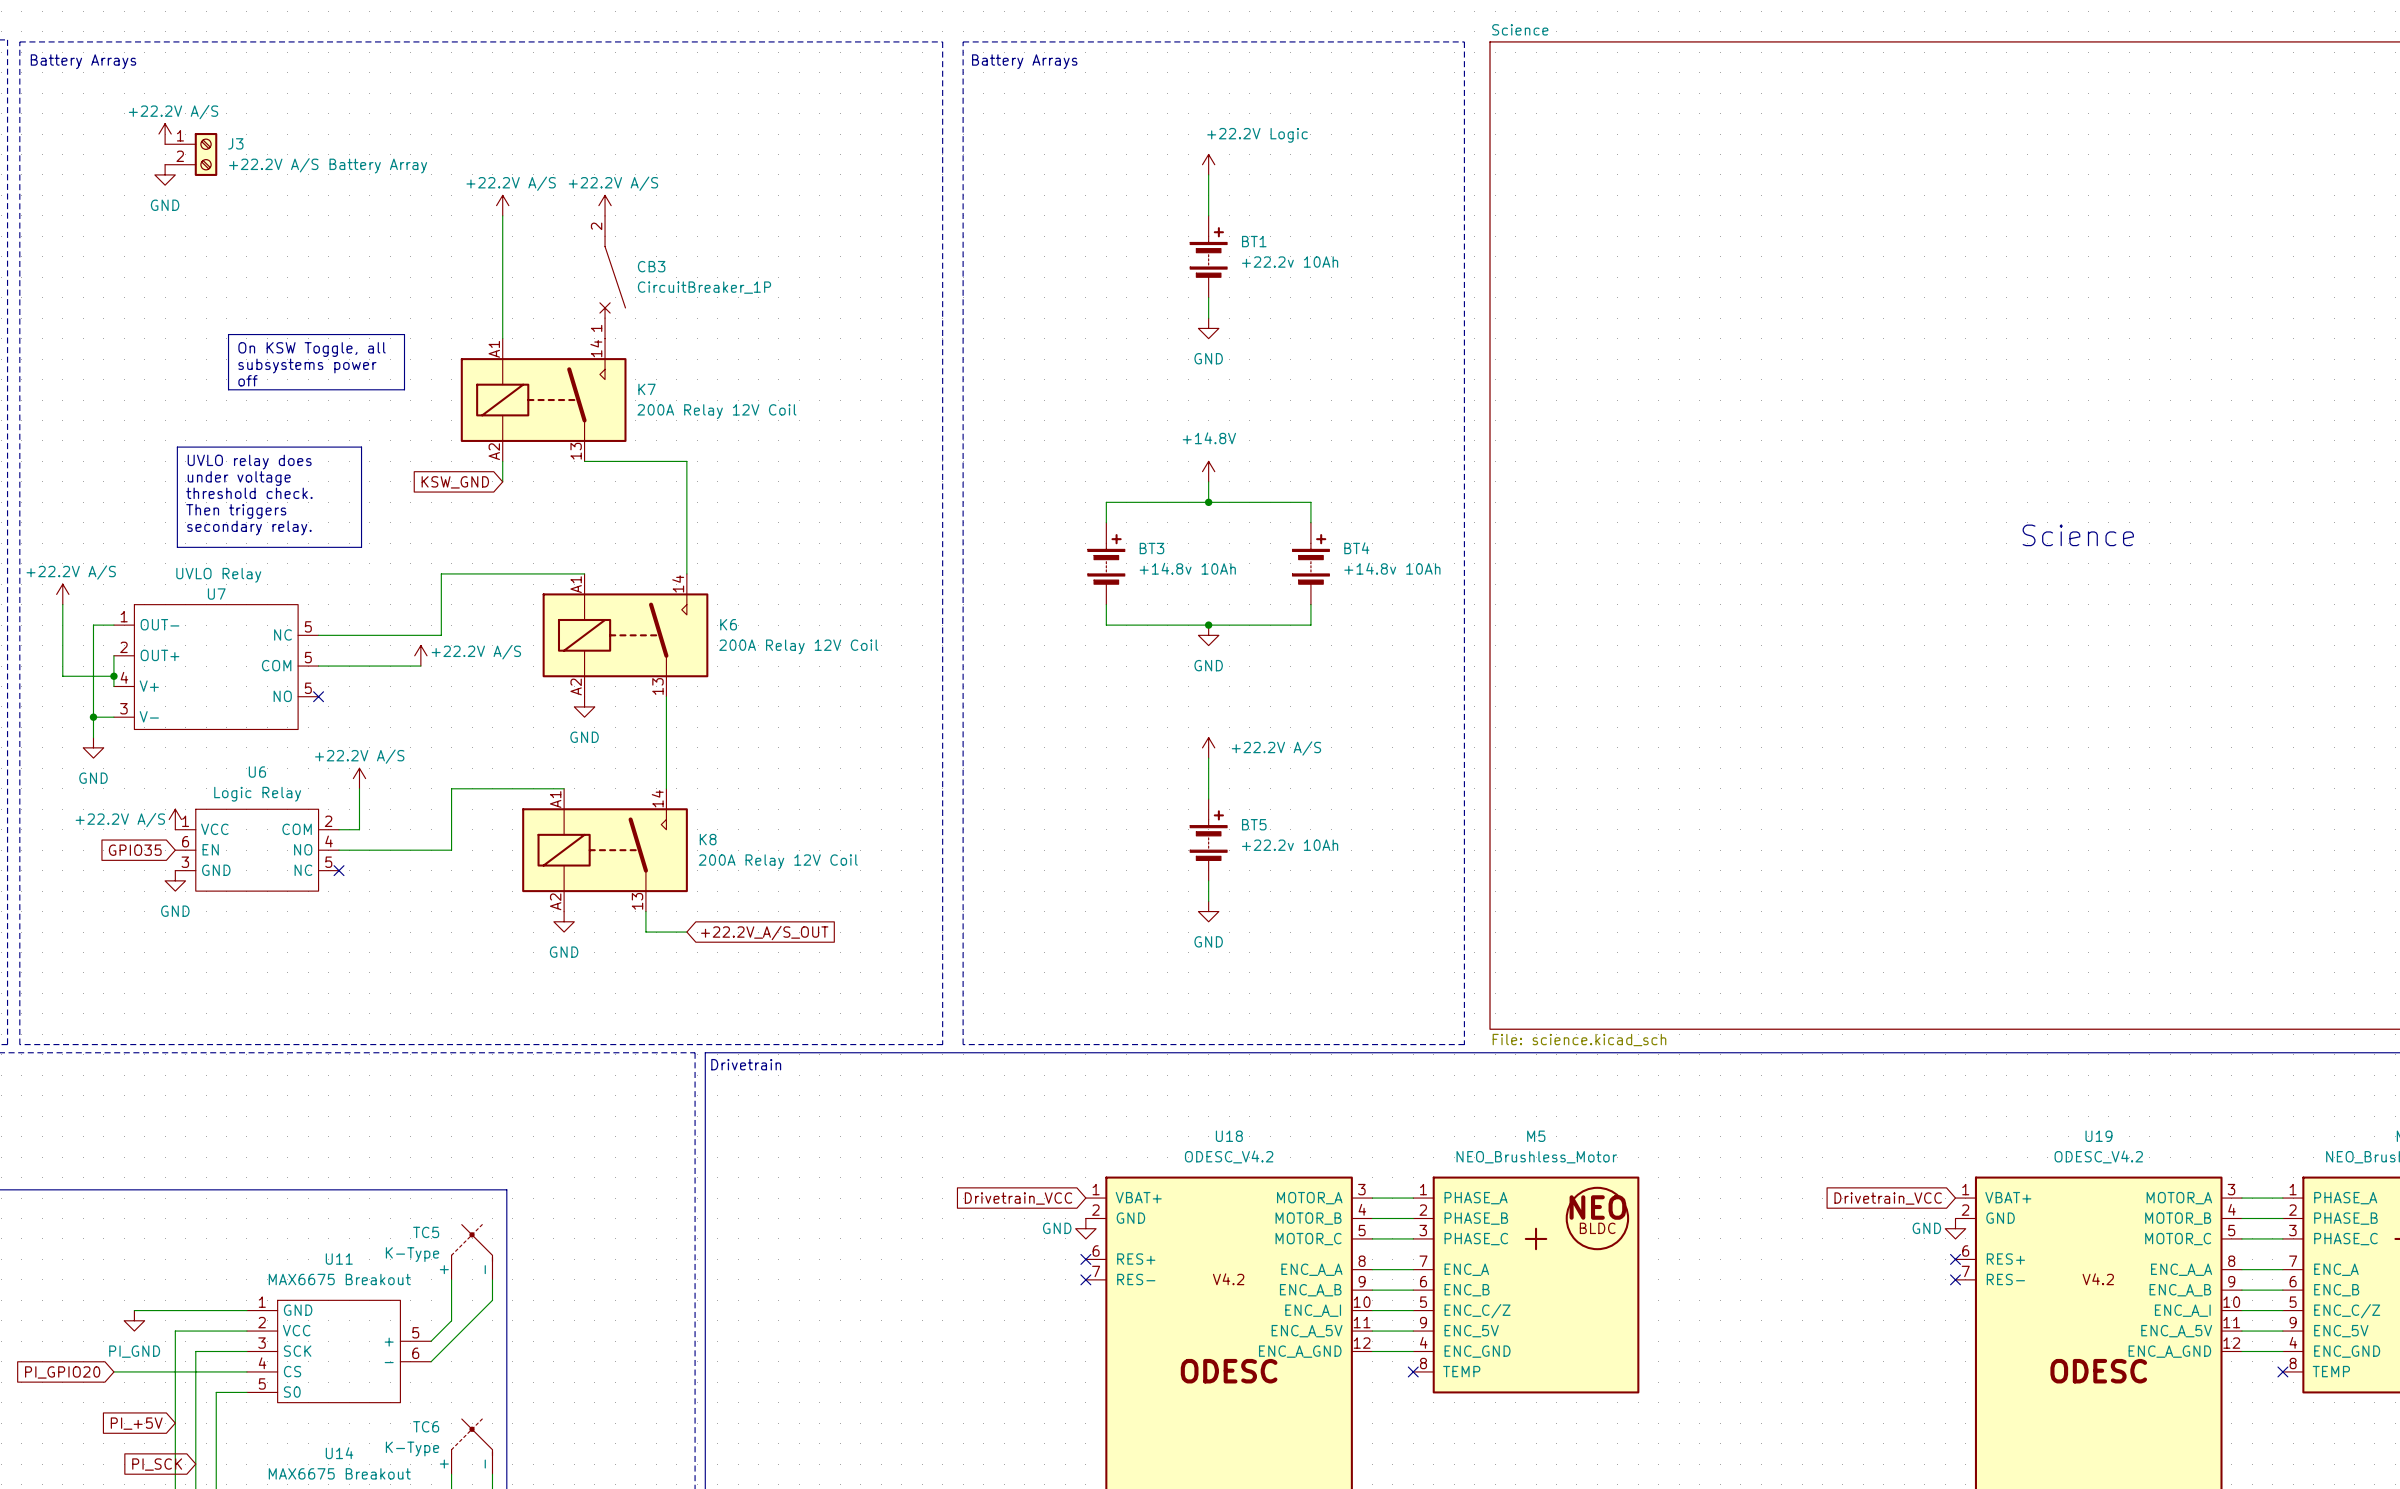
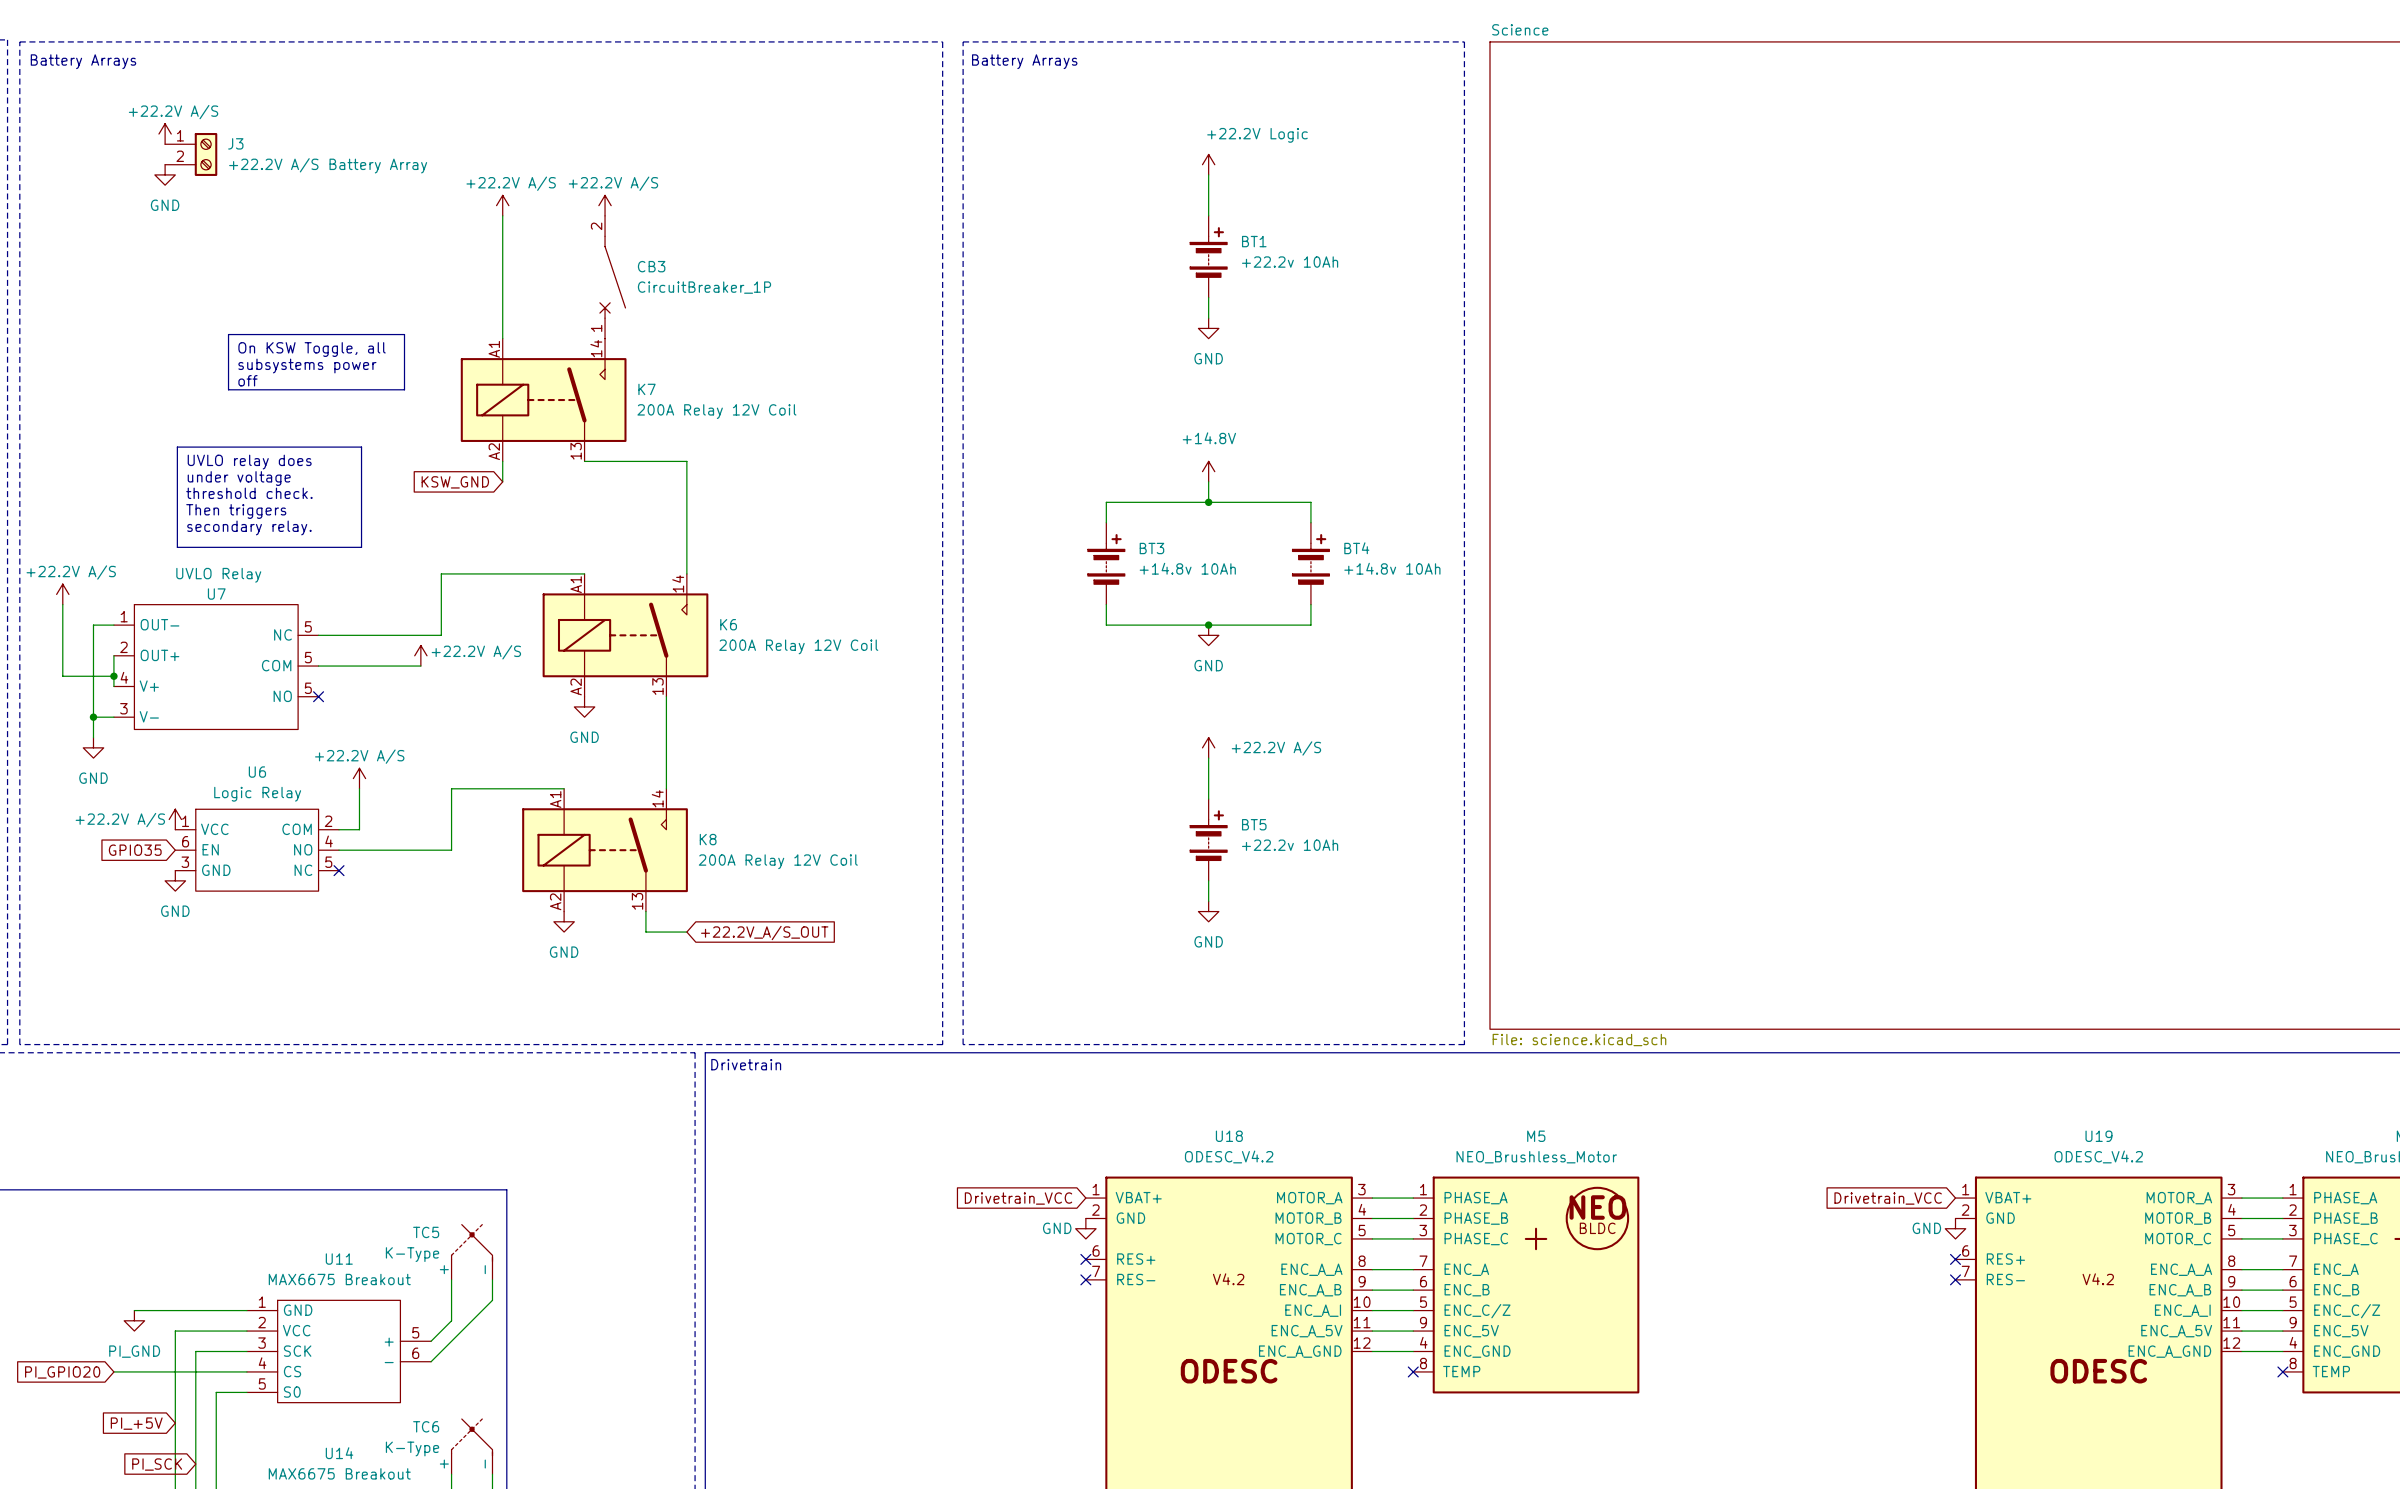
text: Science (2078, 535) -> none

